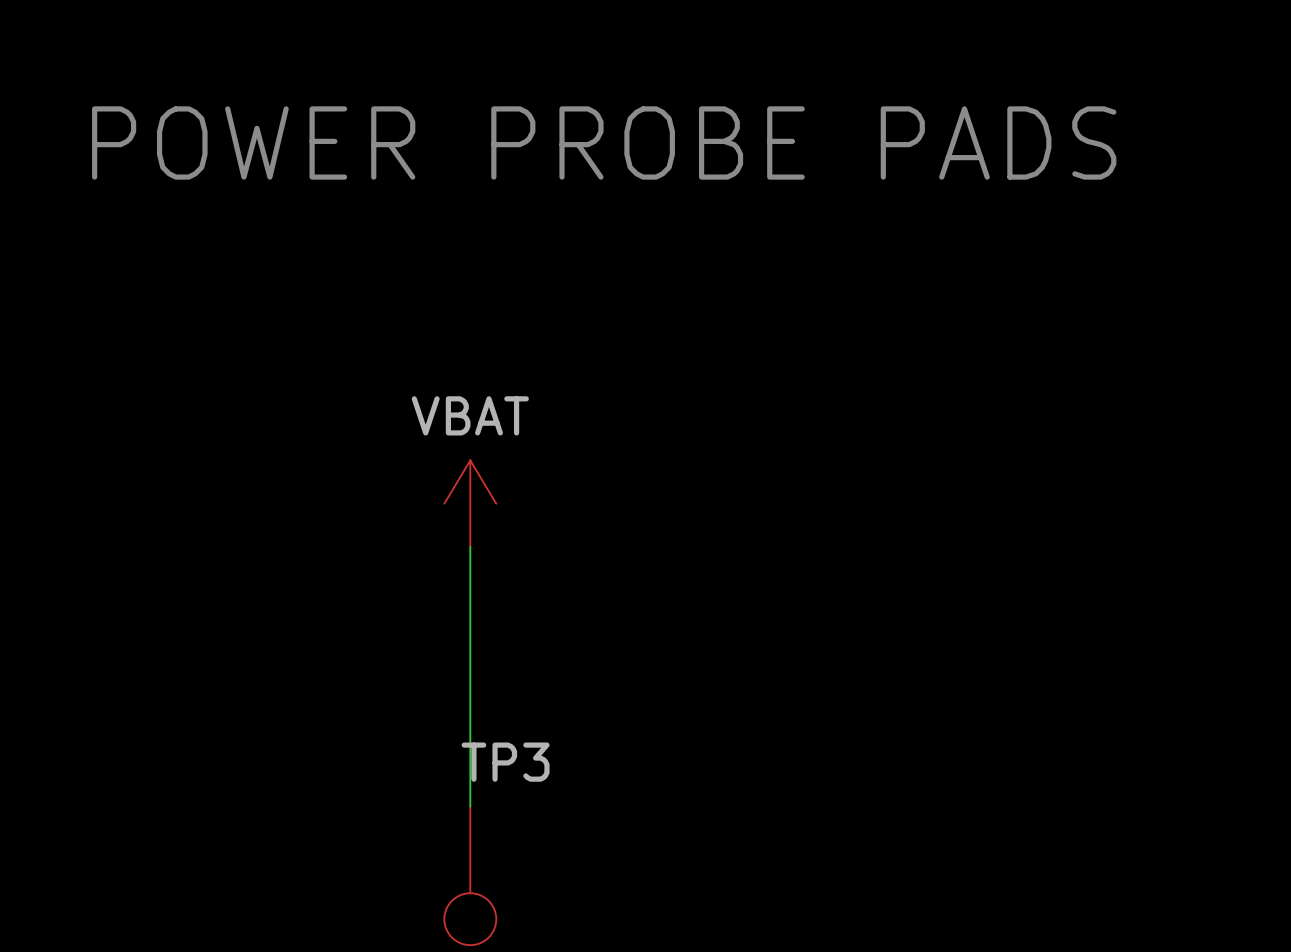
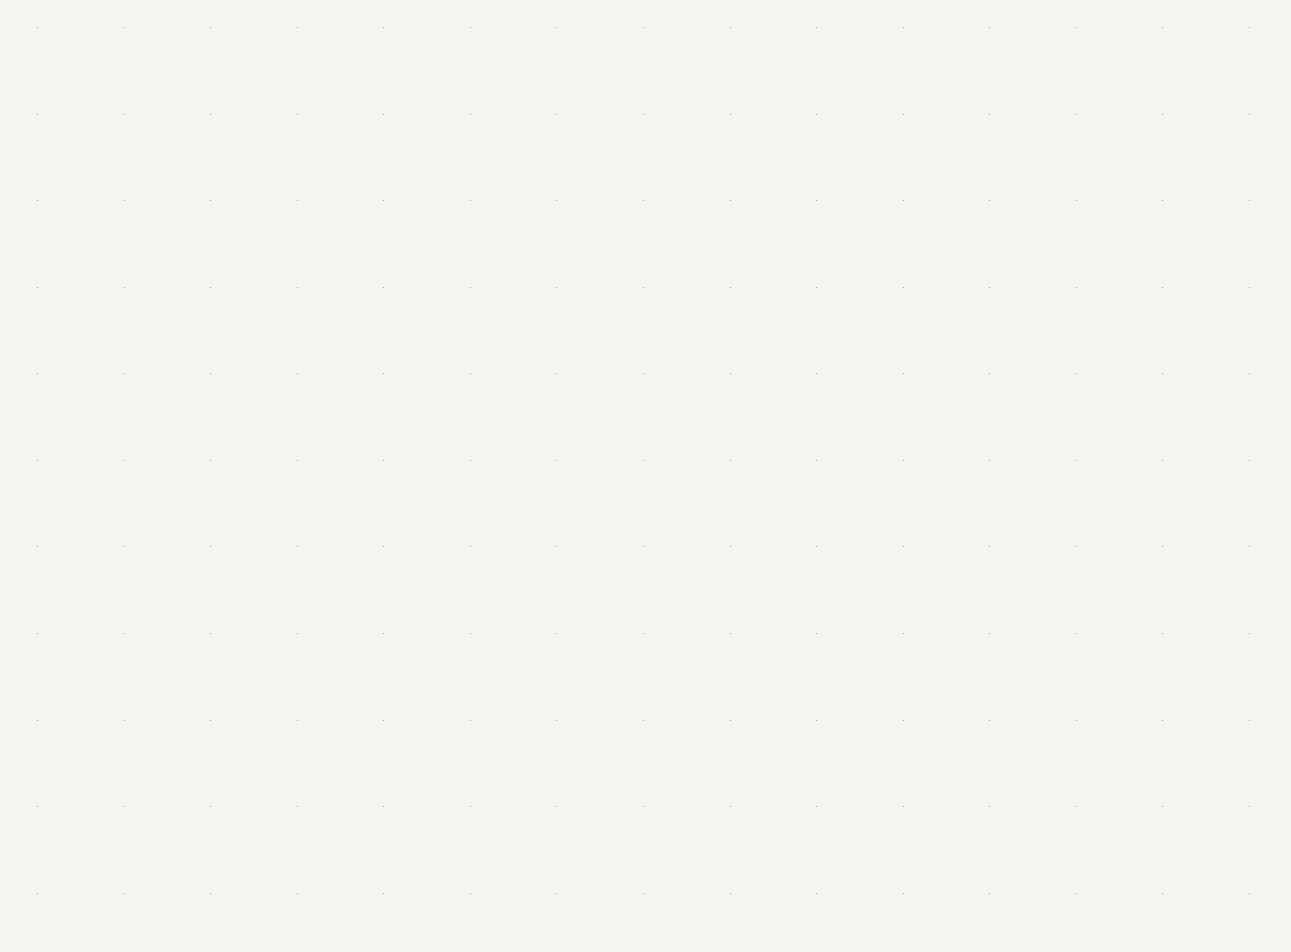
text: POWER PROBE PADS (604, 142) -> none
power symbol: VBAT (470, 503) -> none
wire: (470, 546) (470, 806) -> none
TP3: (470, 875) -> none

